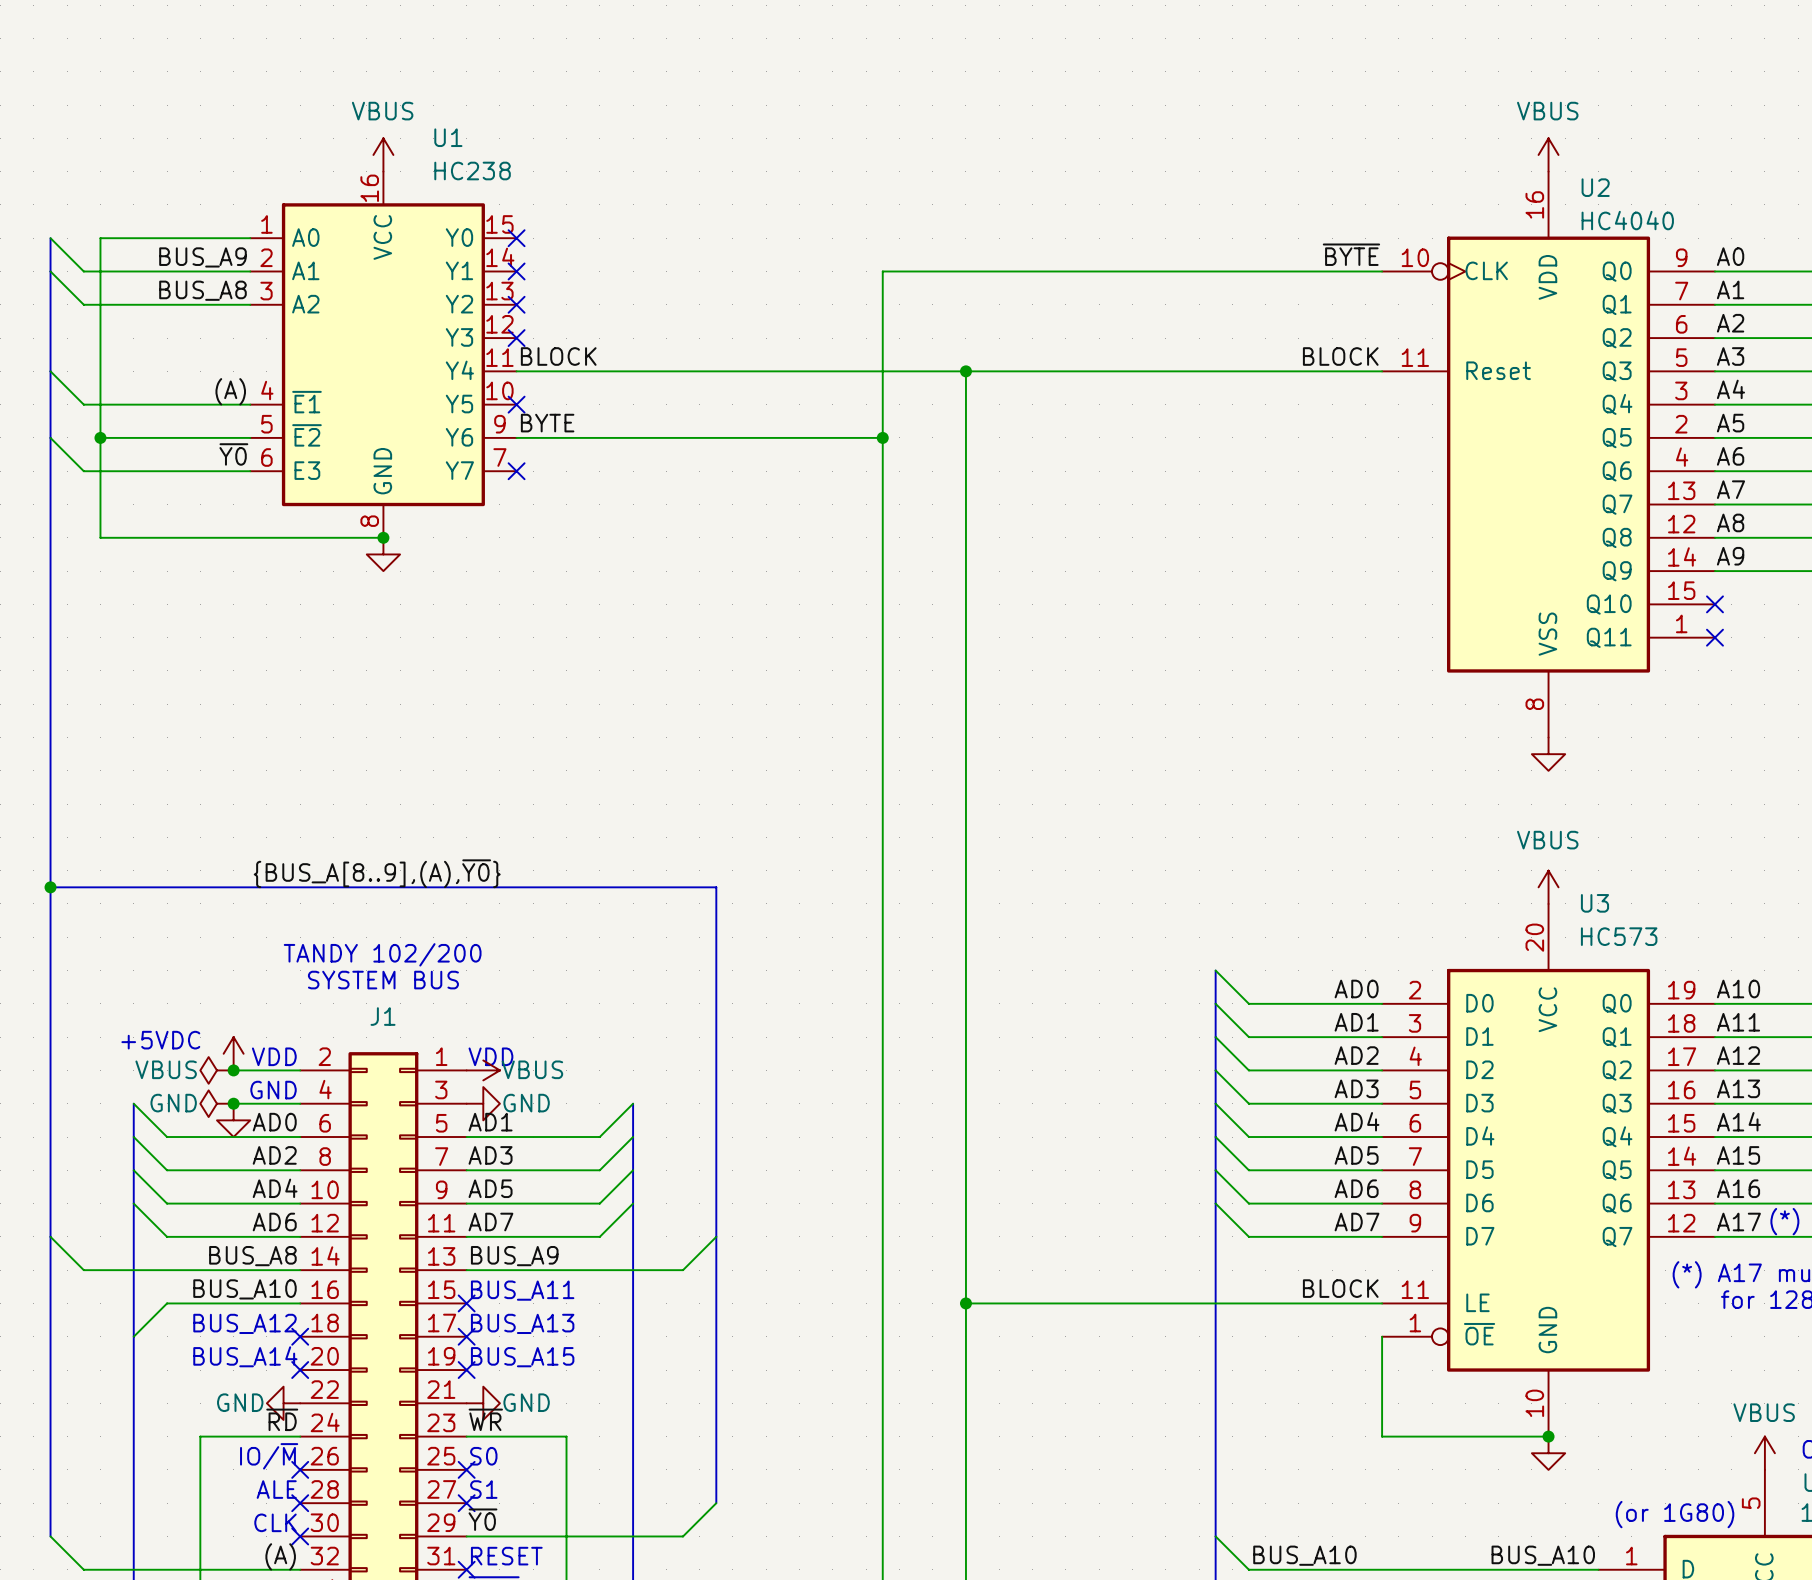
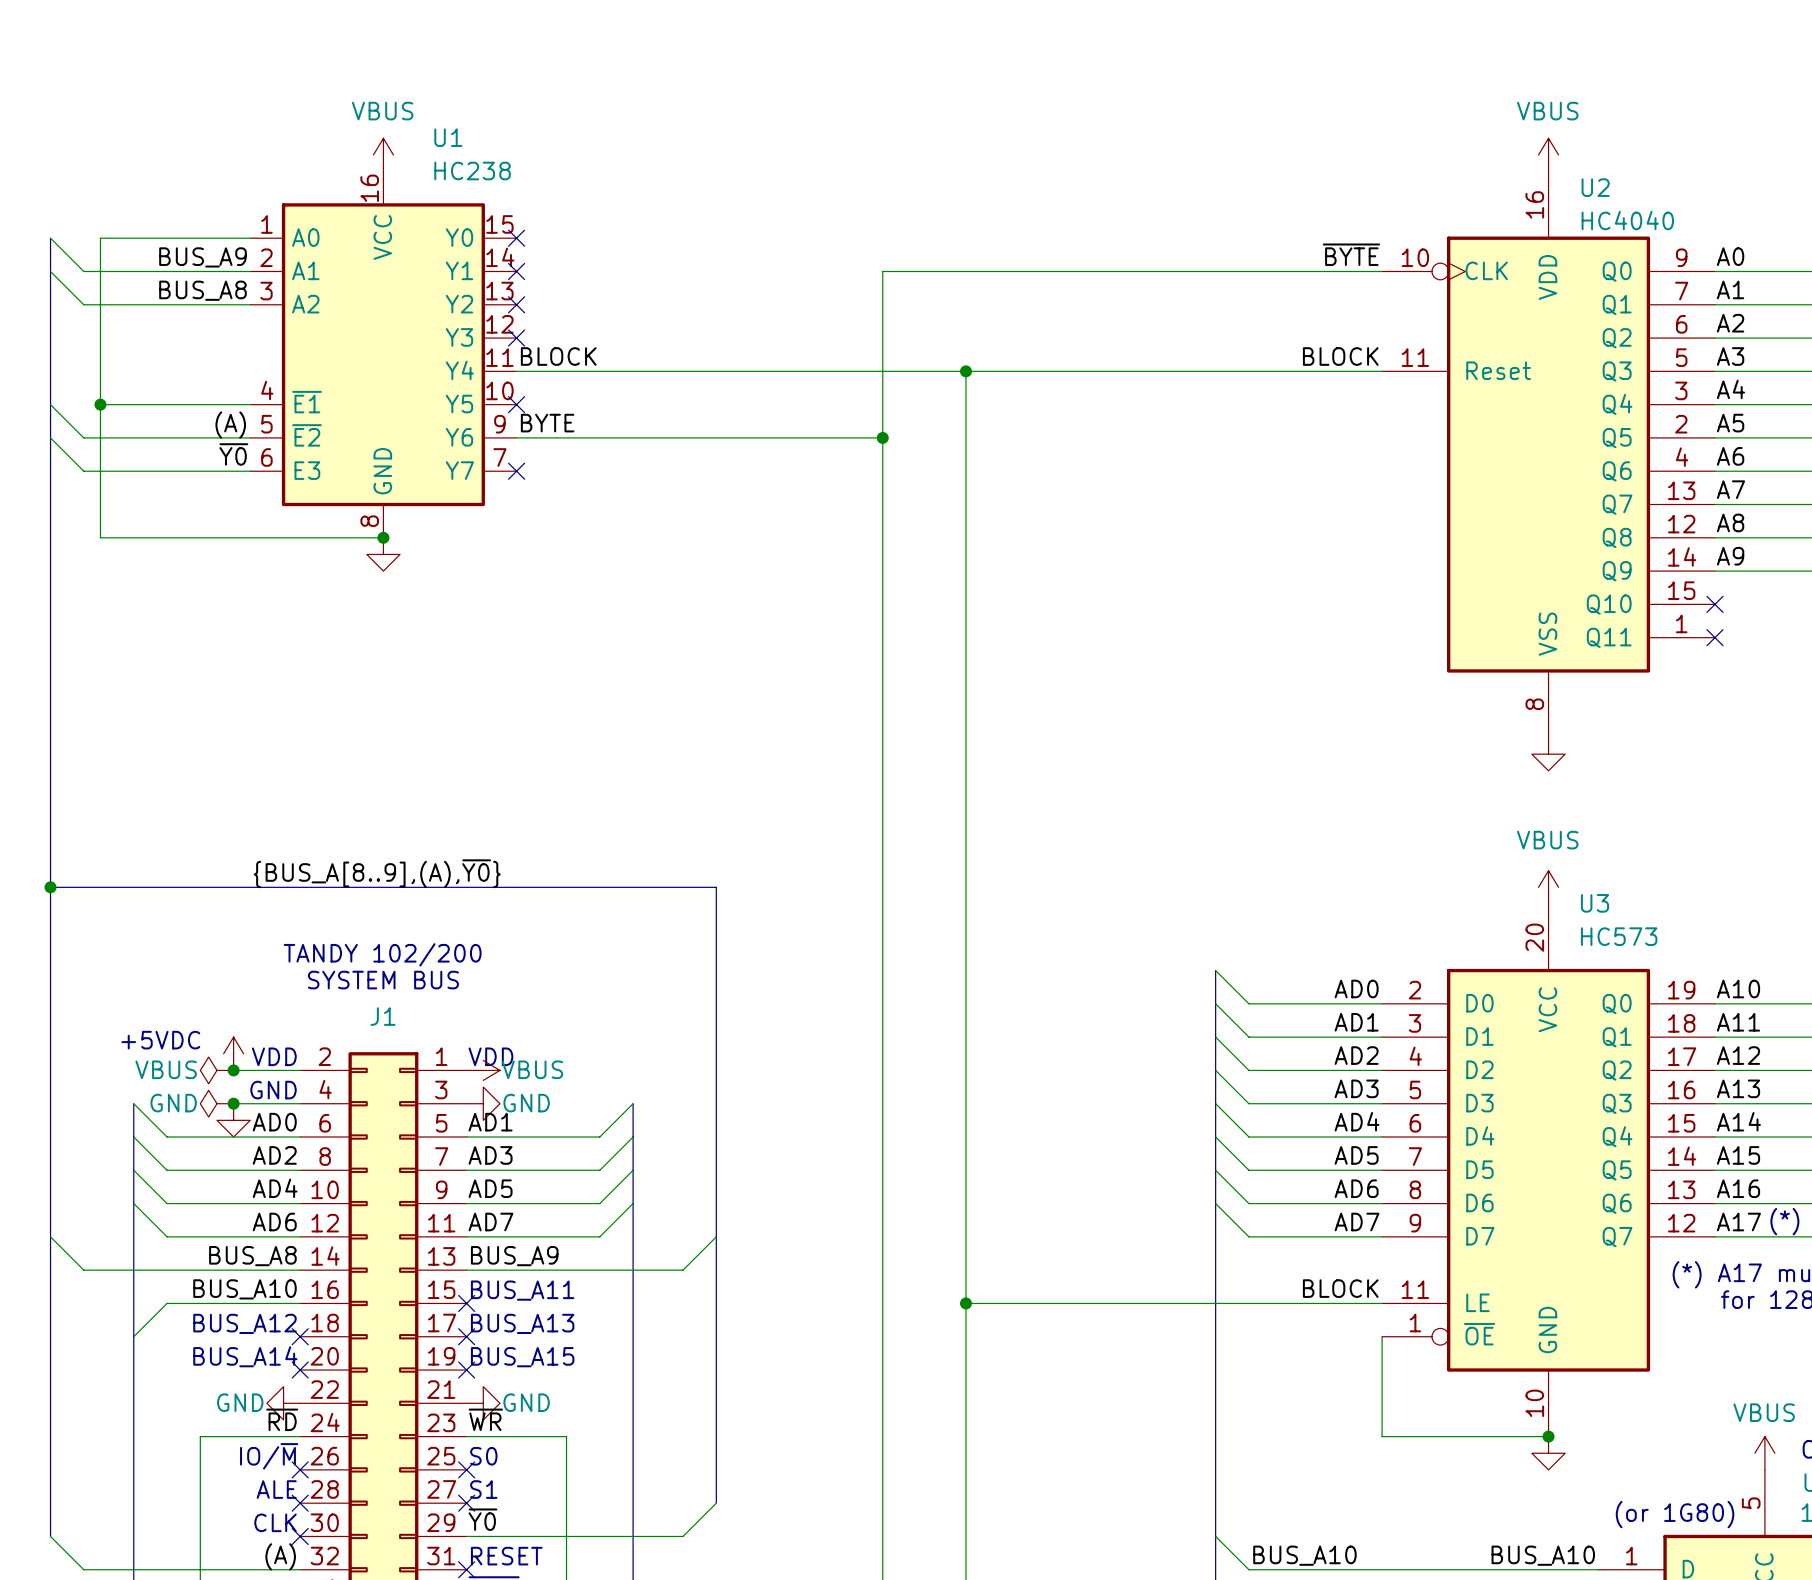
wire: (50, 371) (83, 404) (100, 404) -> (50, 404) (83, 437) (100, 437)
label position: (A) (230, 391) -> (A) (230, 425)
junction position: (100, 437) -> (100, 404)

